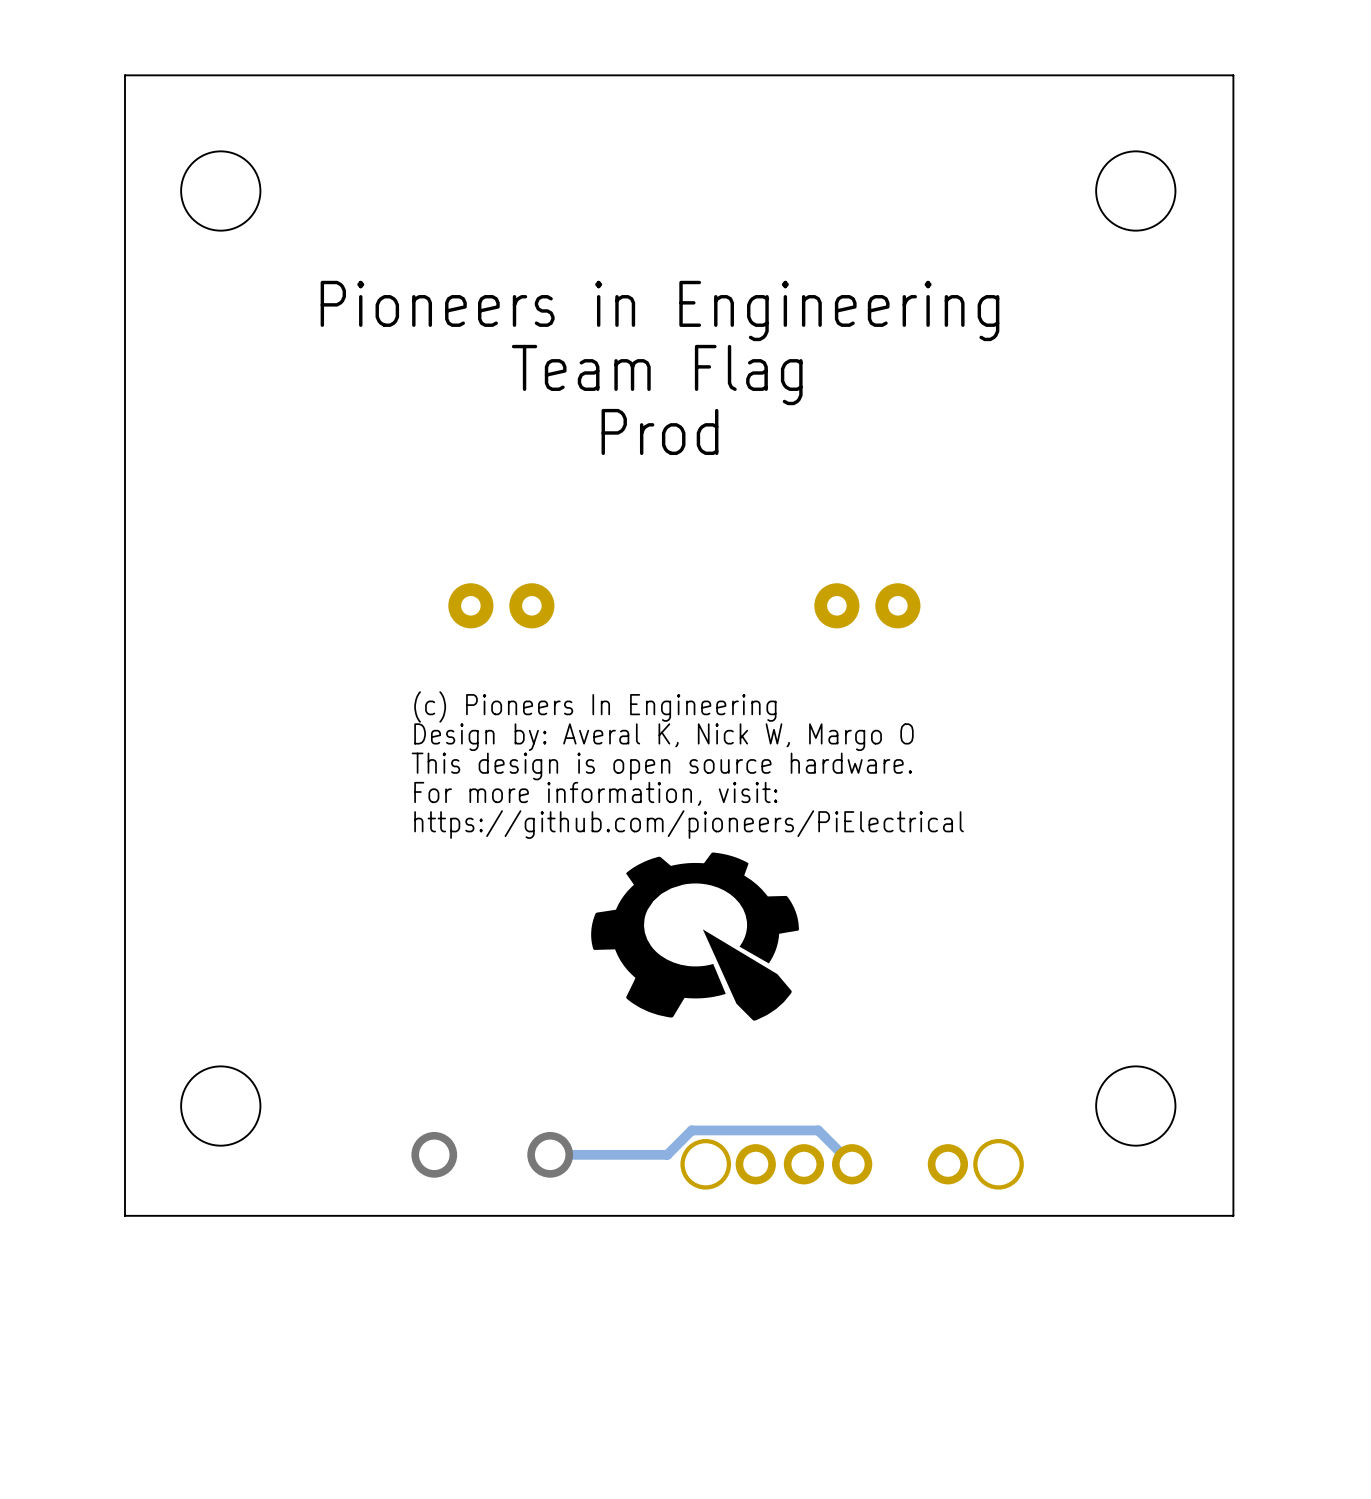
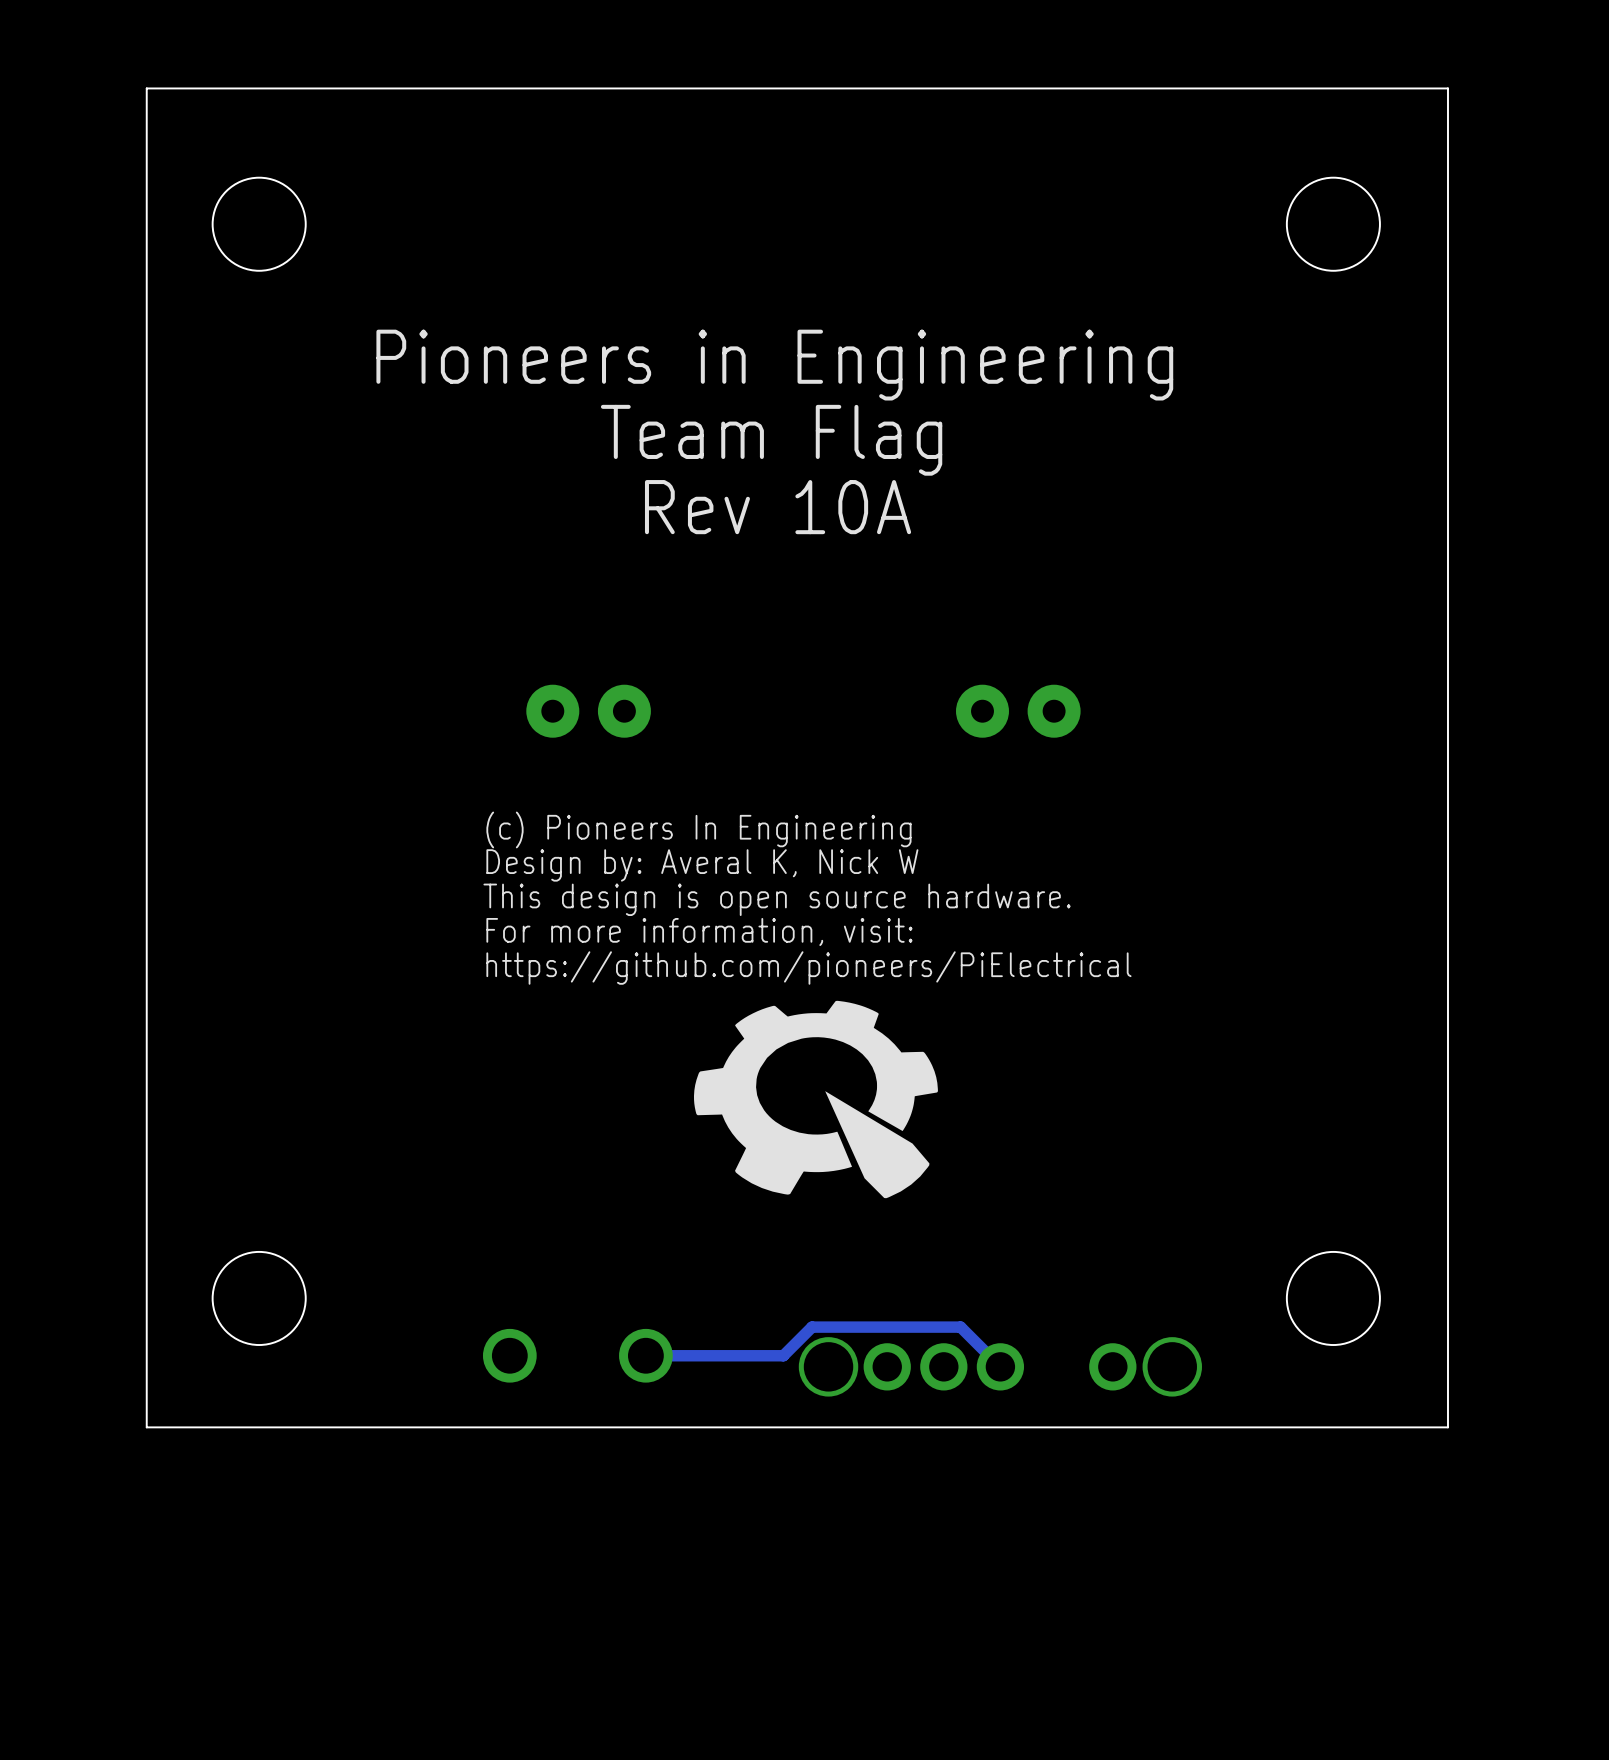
text: Prod (659, 431) -> Rev 10A (778, 507)
text: Design by: Averal K, Nick W, Margo O (663, 737) -> Design by: Averal K, Nick W (702, 865)

